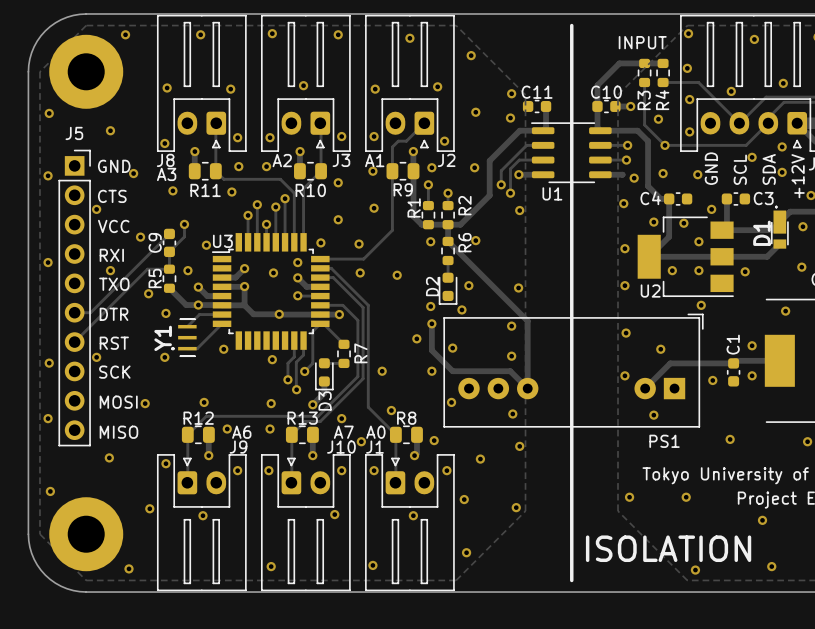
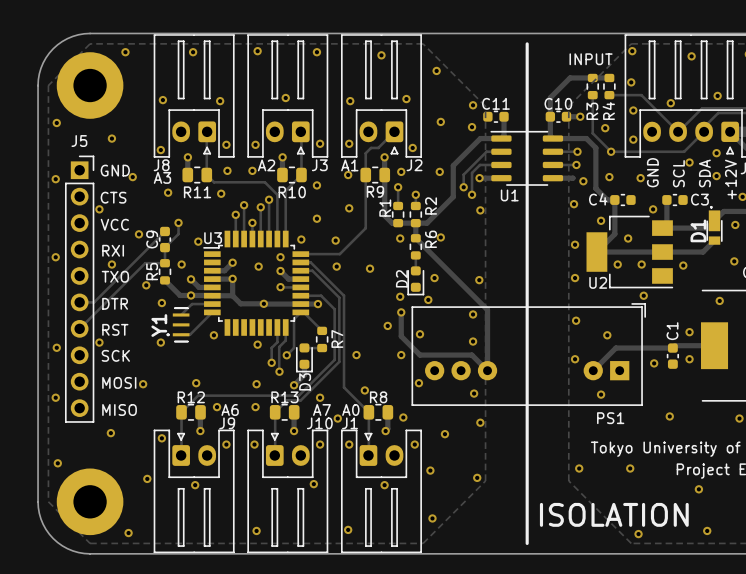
via: (683, 223) -> none
via: none -> (628, 238)
via: (698, 241) -> none

